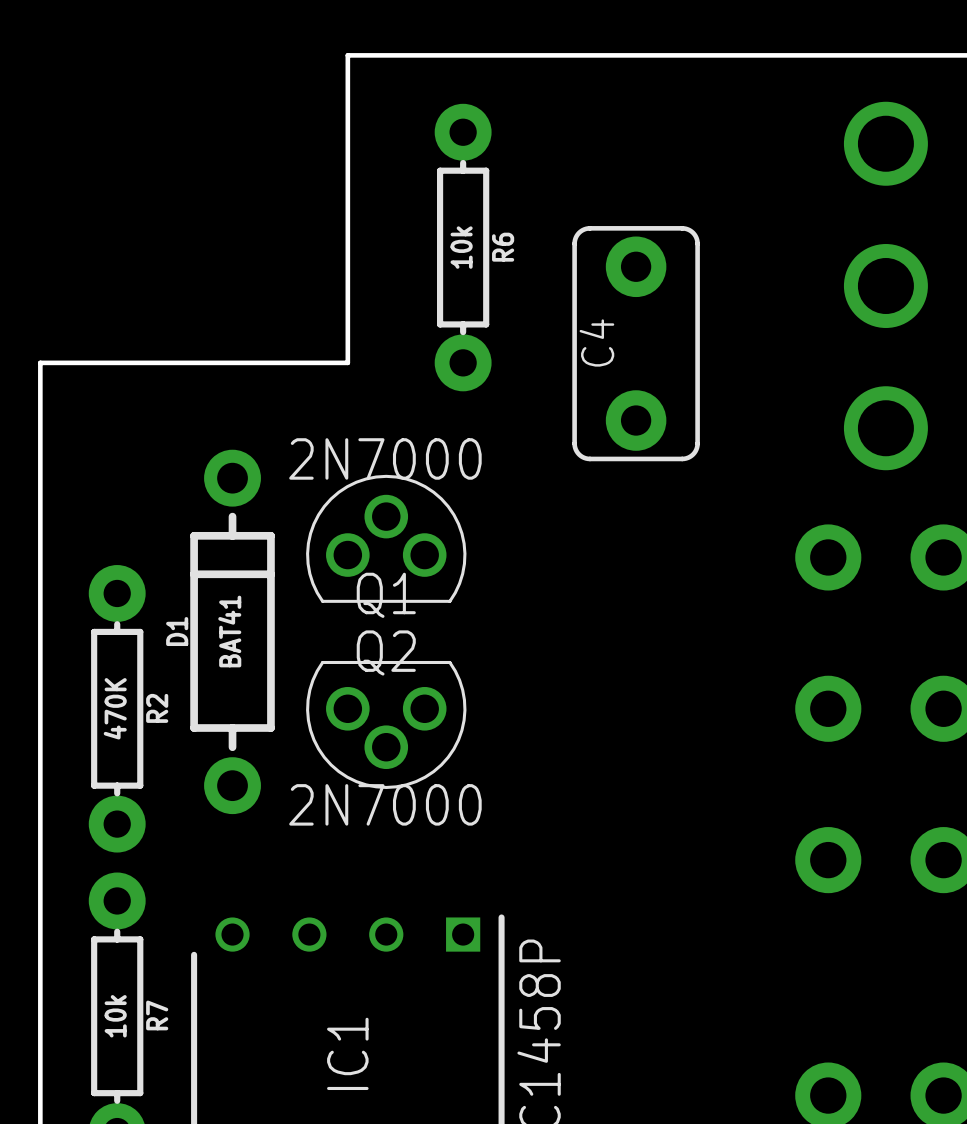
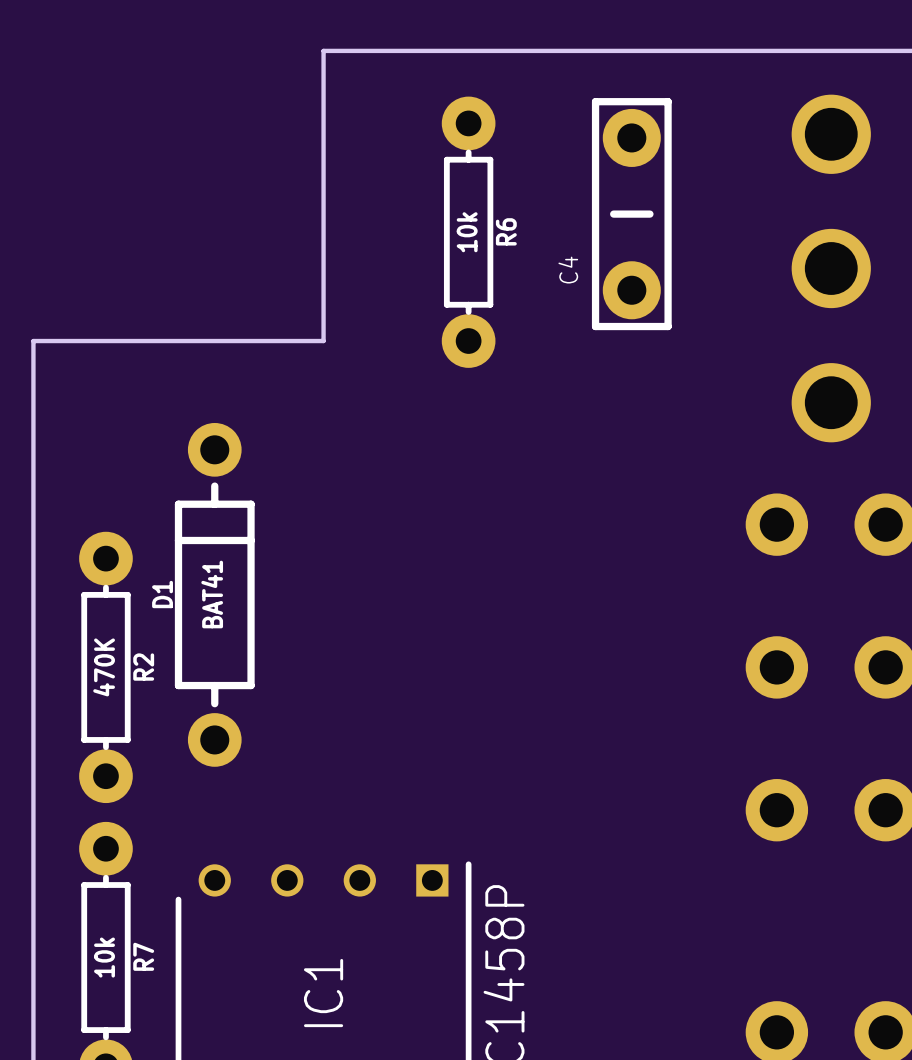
part: none -> (631, 214)
R6 position: (463, 247) -> (468, 232)
text: none -> C4 (568, 270)
C4: (636, 343) -> none
Q1: 2N7000 (386, 538) -> none
Q2: 2N7000 (386, 724) -> none

